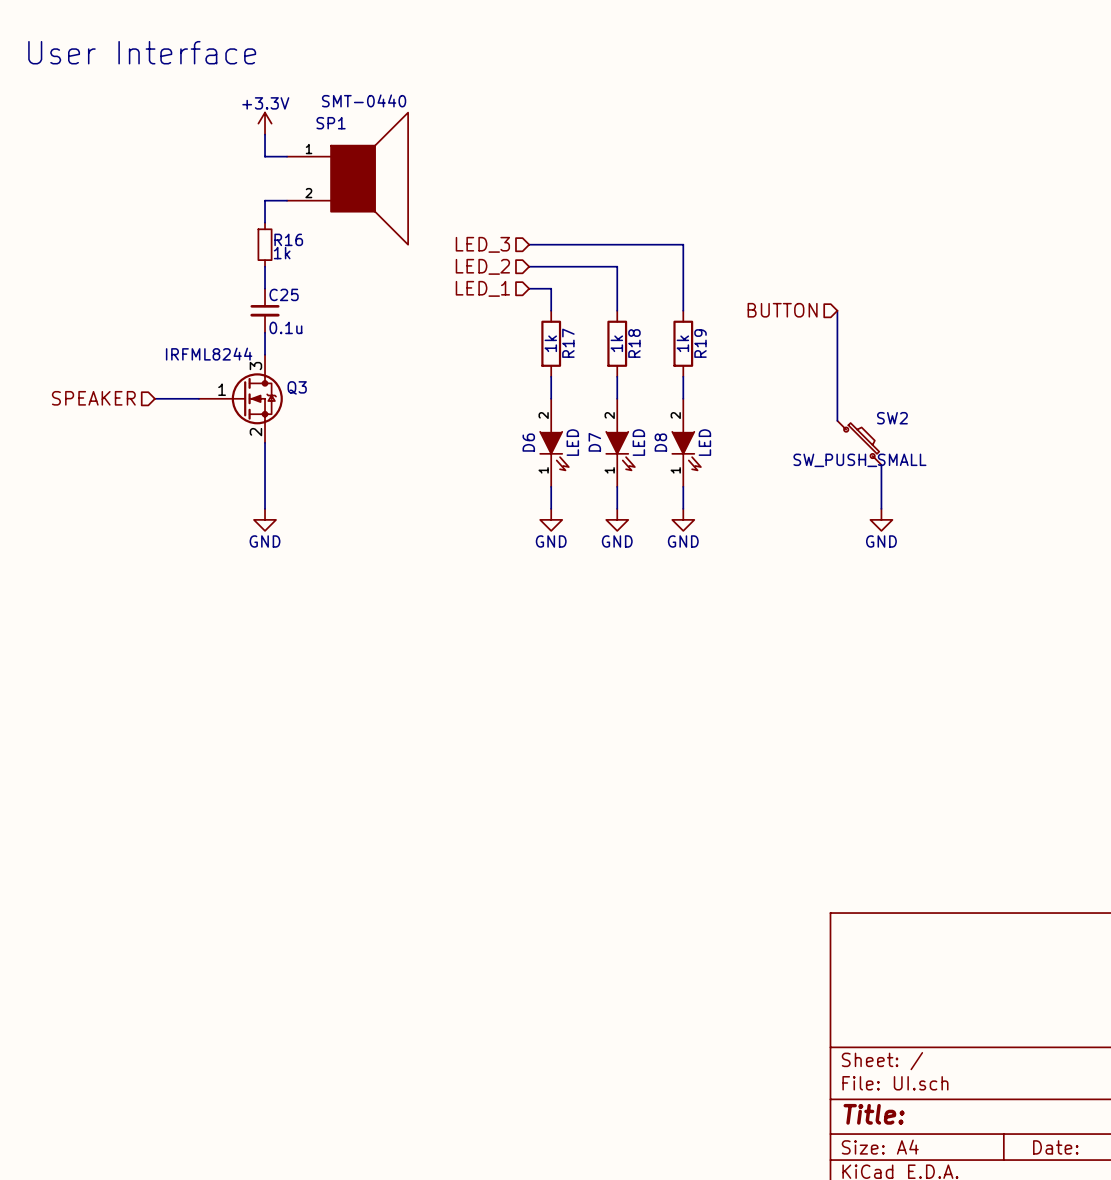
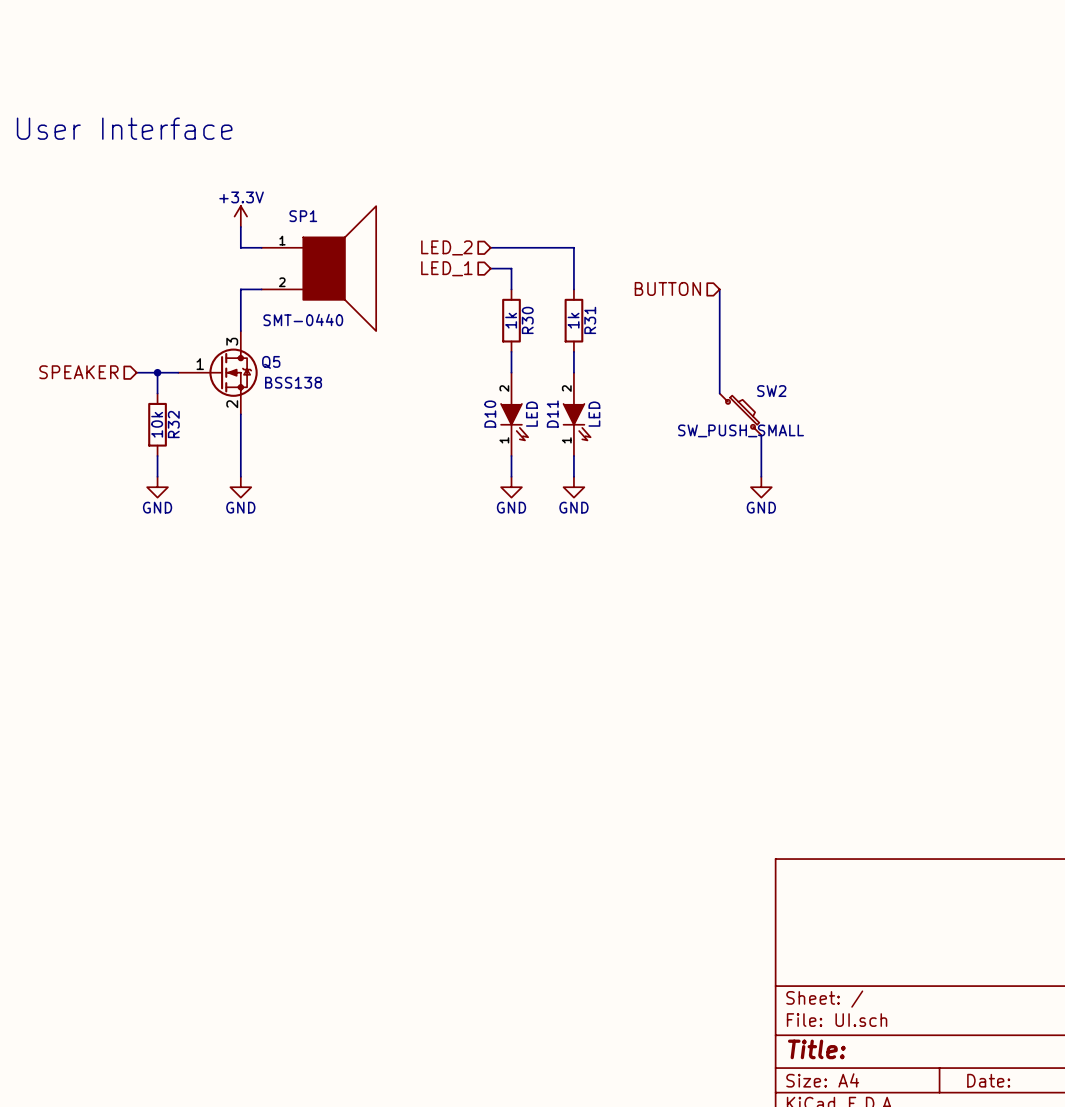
text position: User Interface (142, 52) -> User Interface (124, 128)
SP1 value position: SMT-0440 (364, 100) -> SMT-0440 (303, 320)
power symbol position: +3.3V (265, 123) -> +3.3V (240, 216)
wire: (265, 134) (265, 156) (287, 156) -> (240, 226) (240, 247) (261, 247)
SP1 position: (347, 178) -> (318, 268)
wire: (287, 200) (265, 200) (265, 222) -> (261, 289) (240, 289) (240, 310)
R16: 1k (265, 244) -> none
hierarchical label: LED_3 (482, 244) -> none
wire: (529, 244) (683, 244) (683, 310) -> none
wire: (265, 266) (265, 288) -> (157, 372) (157, 393)
C25: 0.1u (265, 310) -> none
hierarchical label position: BUTTON (782, 310) -> BUTTON (667, 288)
wire: (837, 310) (837, 420) -> (719, 289) (719, 393)
R17 name: R17 (568, 343) -> R30 (527, 320)
R18 name: R18 (634, 343) -> R31 (590, 320)
R19: 1k (683, 343) -> none
Q3 value: IRFML8244 (209, 354) -> BSS138 (293, 382)
wire: (683, 376) (683, 398) -> none
Q3 name: Q3 (297, 387) -> Q5 (271, 362)
junction: none -> (157, 372)
D6 name: D6 (528, 442) -> D10 (490, 414)
D7 name: D7 (594, 442) -> D11 (552, 414)
D8: LED (686, 442) -> none
SW2 position: (859, 442) -> (740, 414)
R32: none -> 10k (157, 424)
wire: (881, 464) (881, 508) -> (761, 435) (761, 476)
wire: none -> (157, 455) (157, 476)
wire: (683, 486) (683, 508) -> none
power symbol: none -> GND (157, 487)
power symbol: GND (683, 519) -> none
power symbol: none -> GND (761, 487)
power symbol: GND (881, 519) -> none

